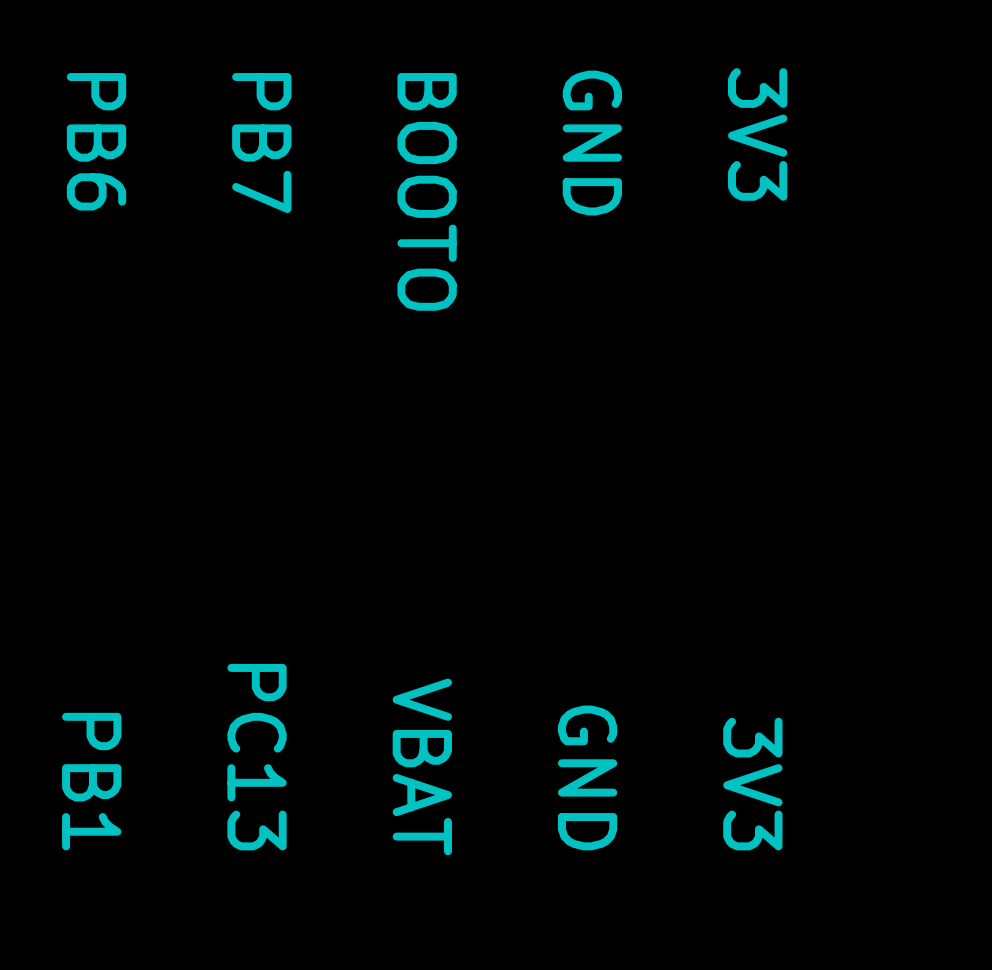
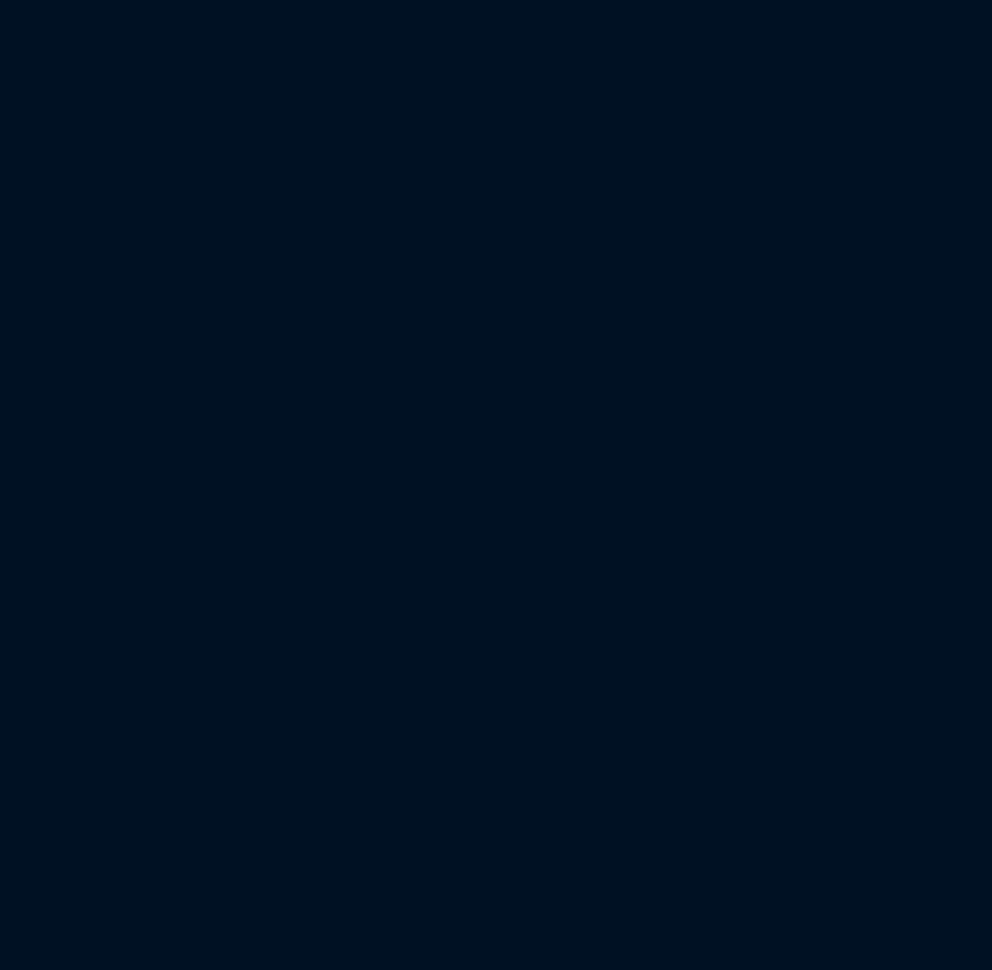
text: 3V3 (757, 134) -> none
text: PB6 (96, 141) -> none
text: PB7 (261, 143) -> none
text: GND (592, 143) -> none
text: BOOTO (427, 191) -> none
text: PC13 (257, 757) -> none
text: VBAT (422, 766) -> none
text: GND (587, 777) -> none
text: PB1 (91, 781) -> none
text: 3V3 (752, 784) -> none

